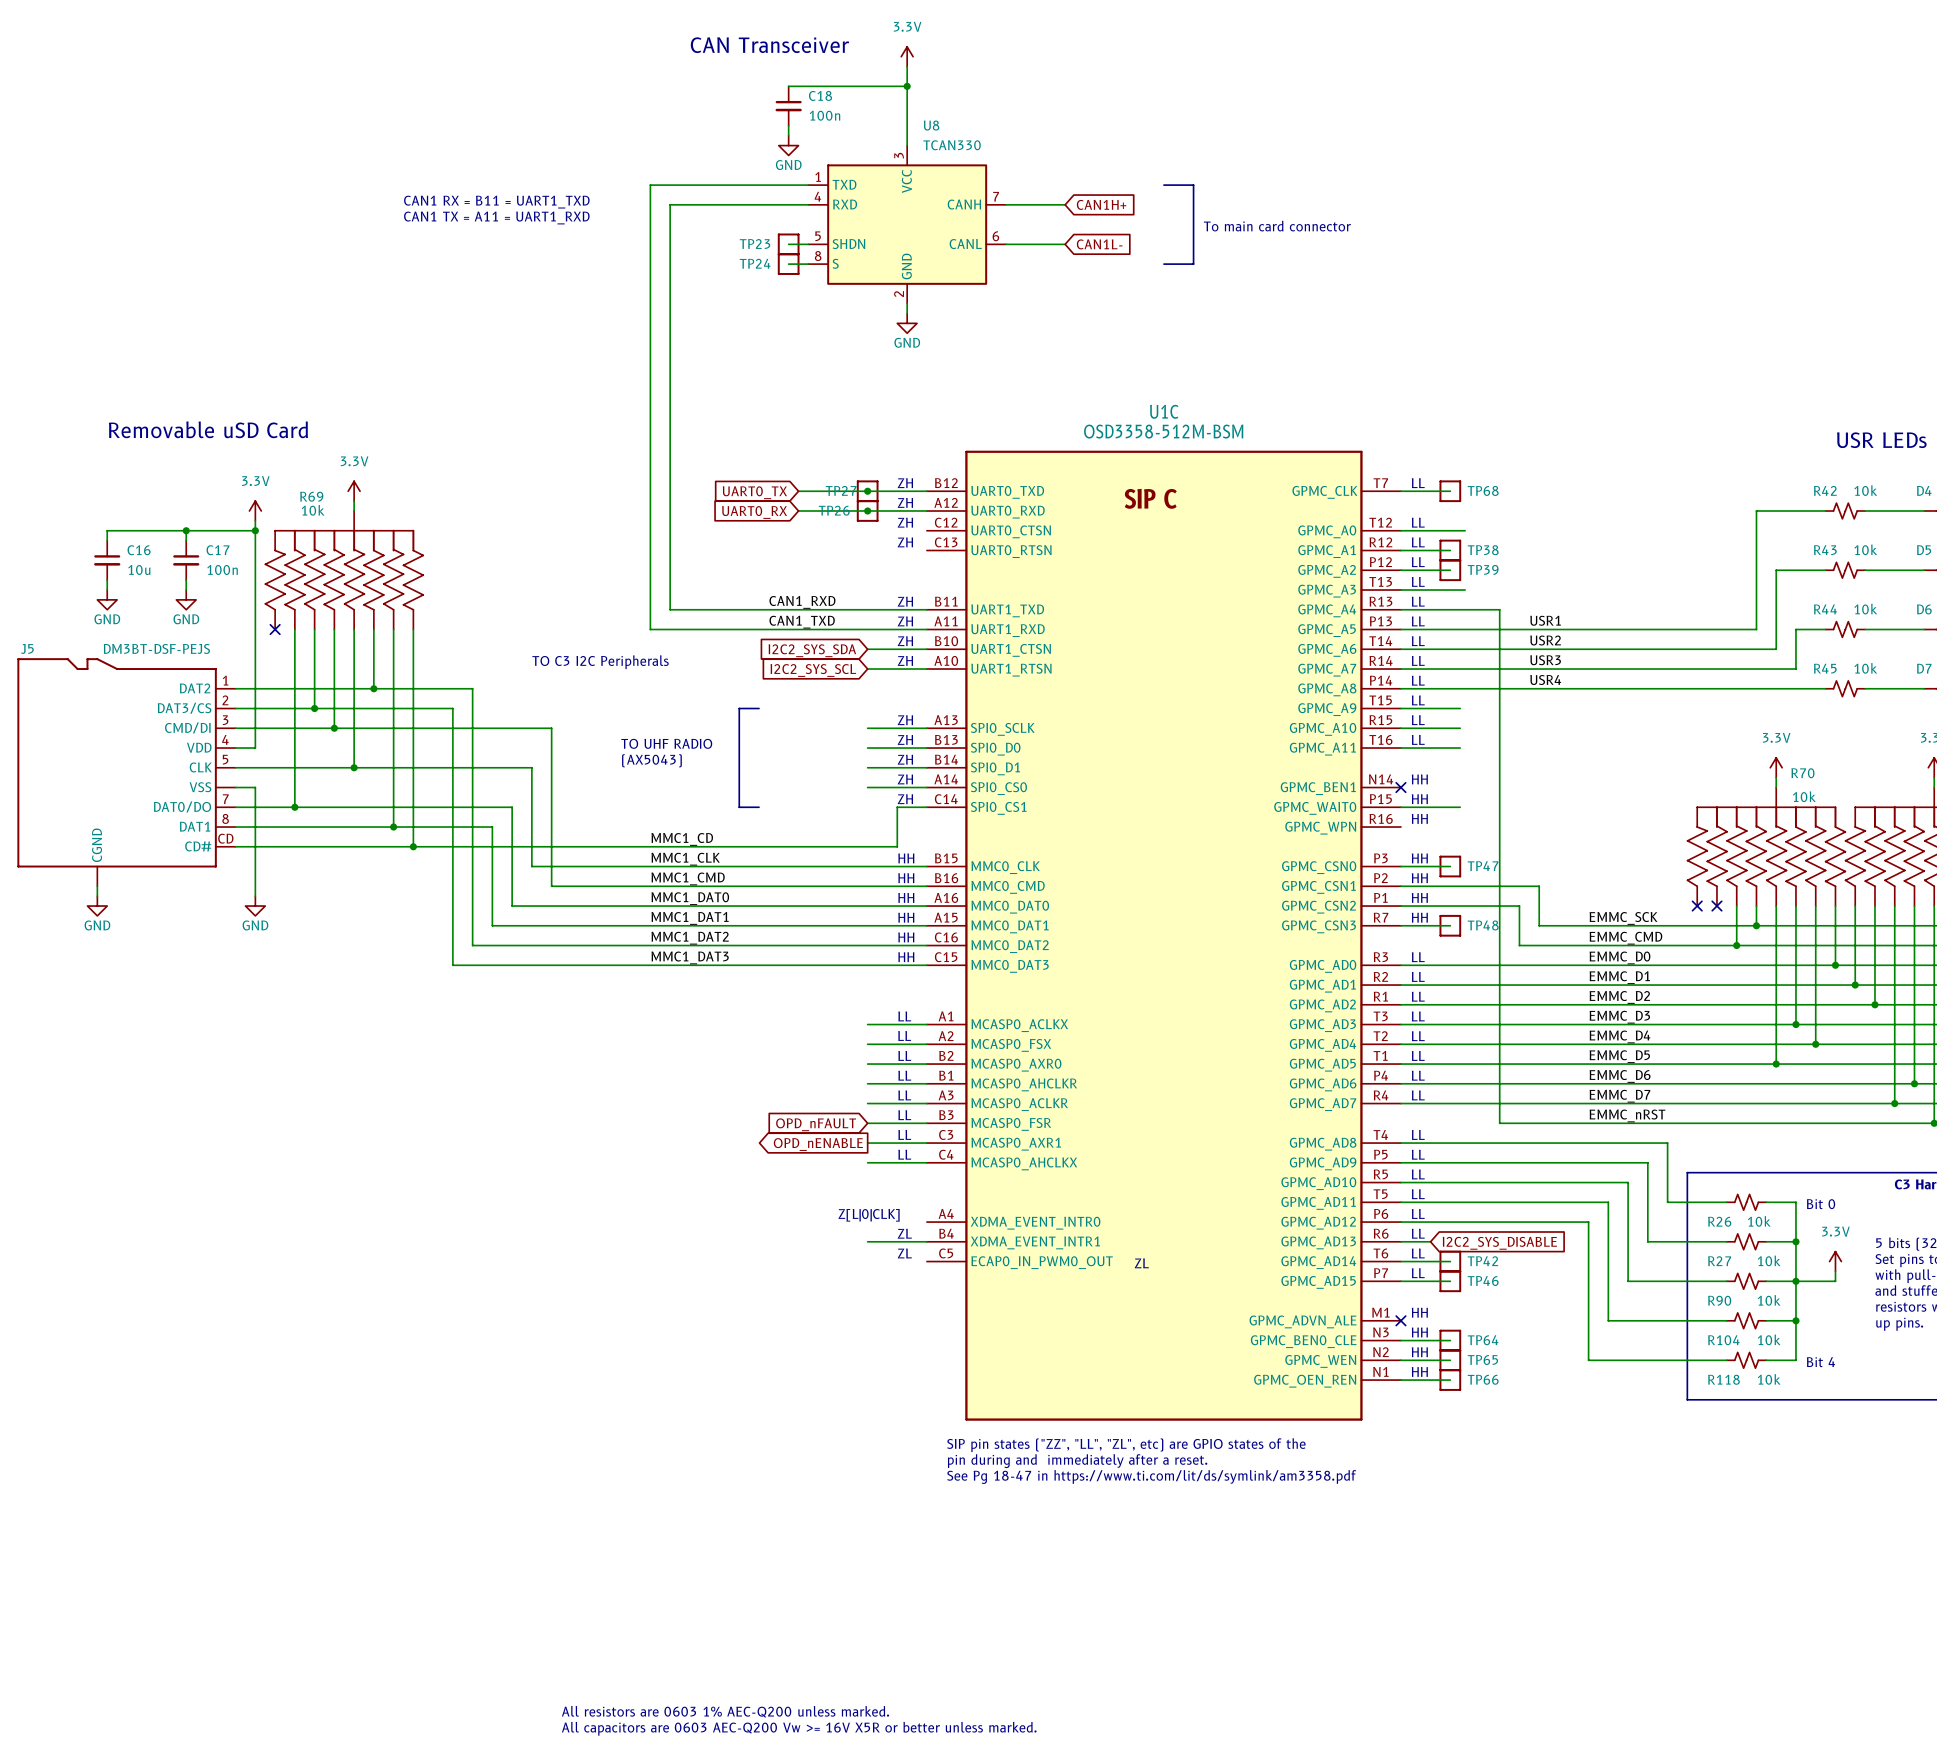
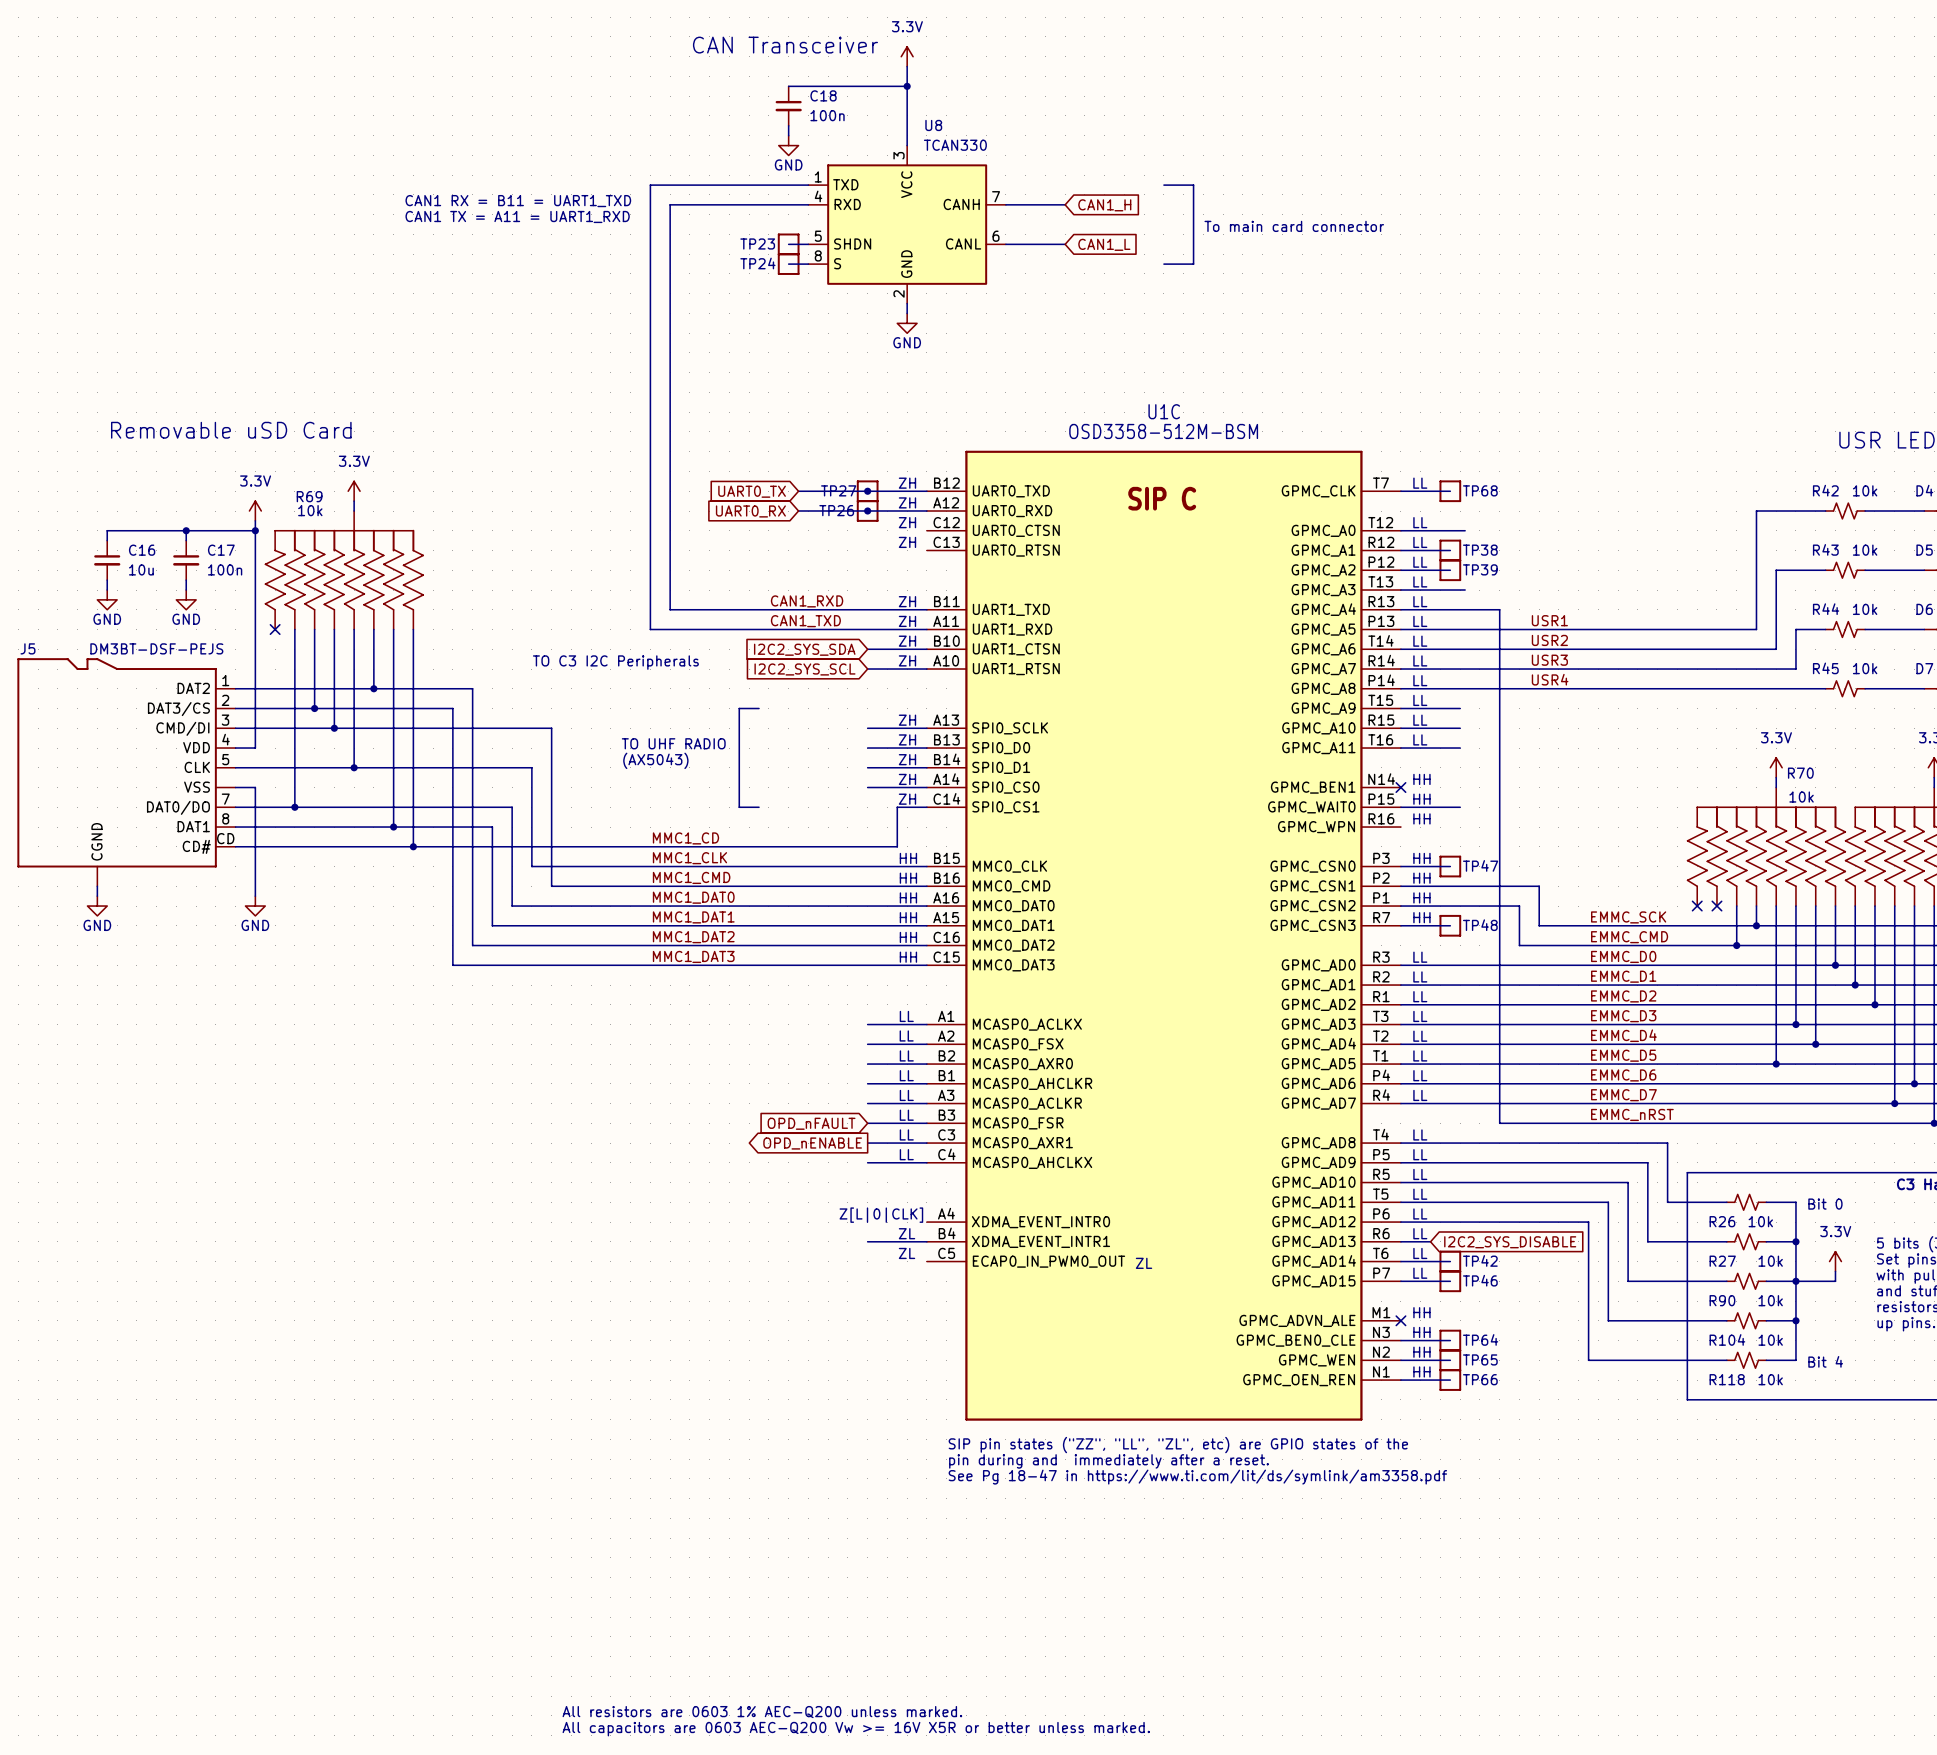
global label: CAN1H+ (1101, 204) -> CAN1_H (1104, 205)
global label: CAN1L- (1099, 244) -> CAN1_L (1104, 244)

